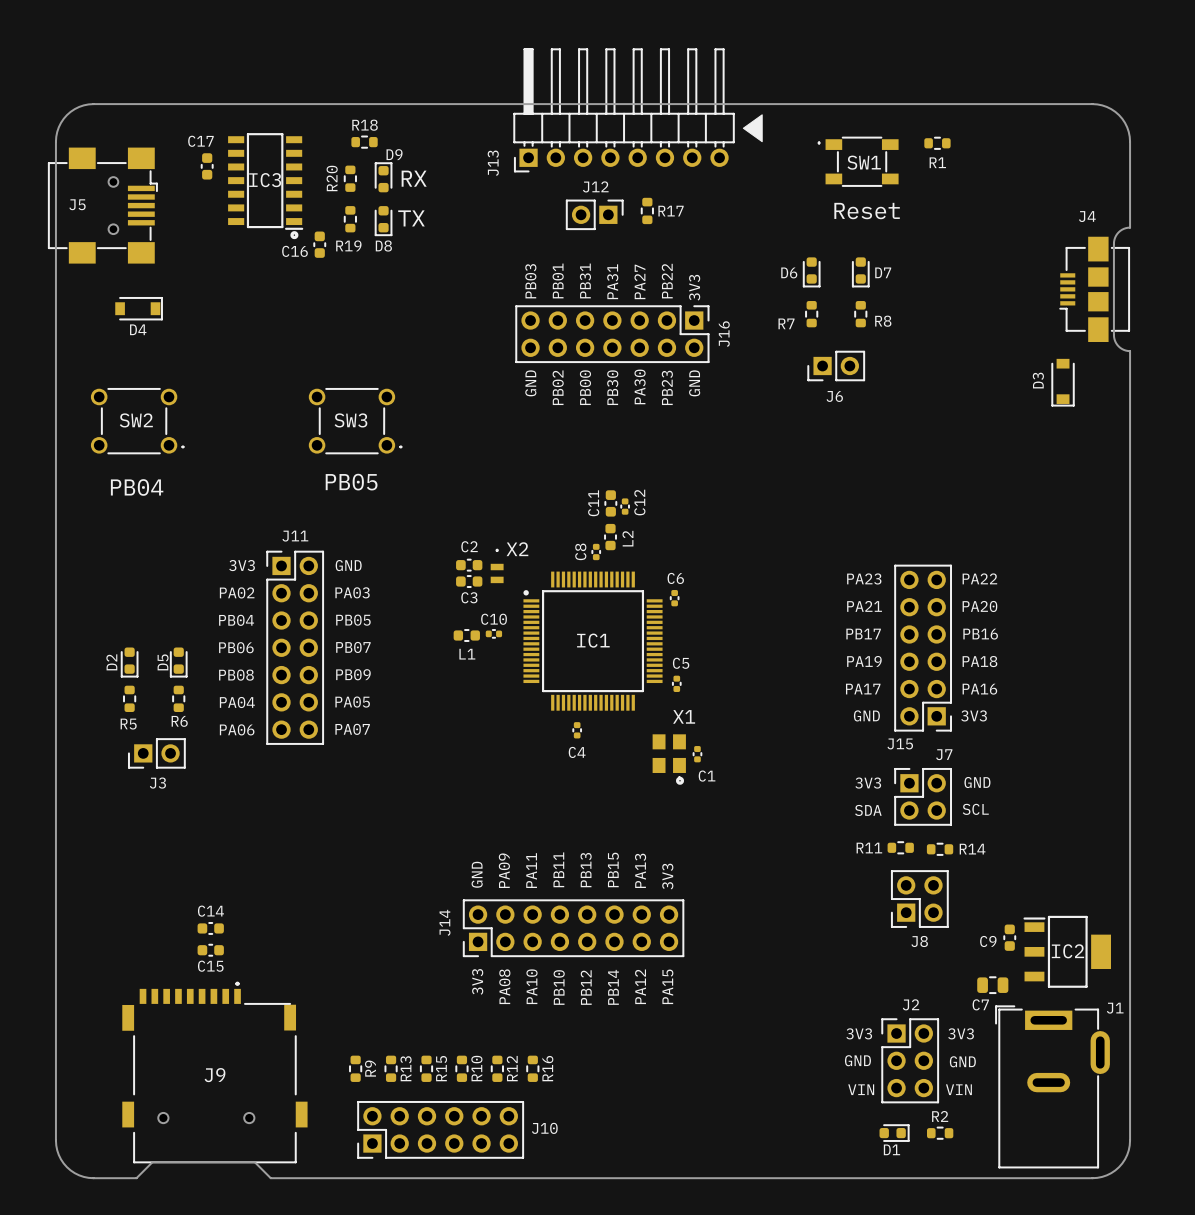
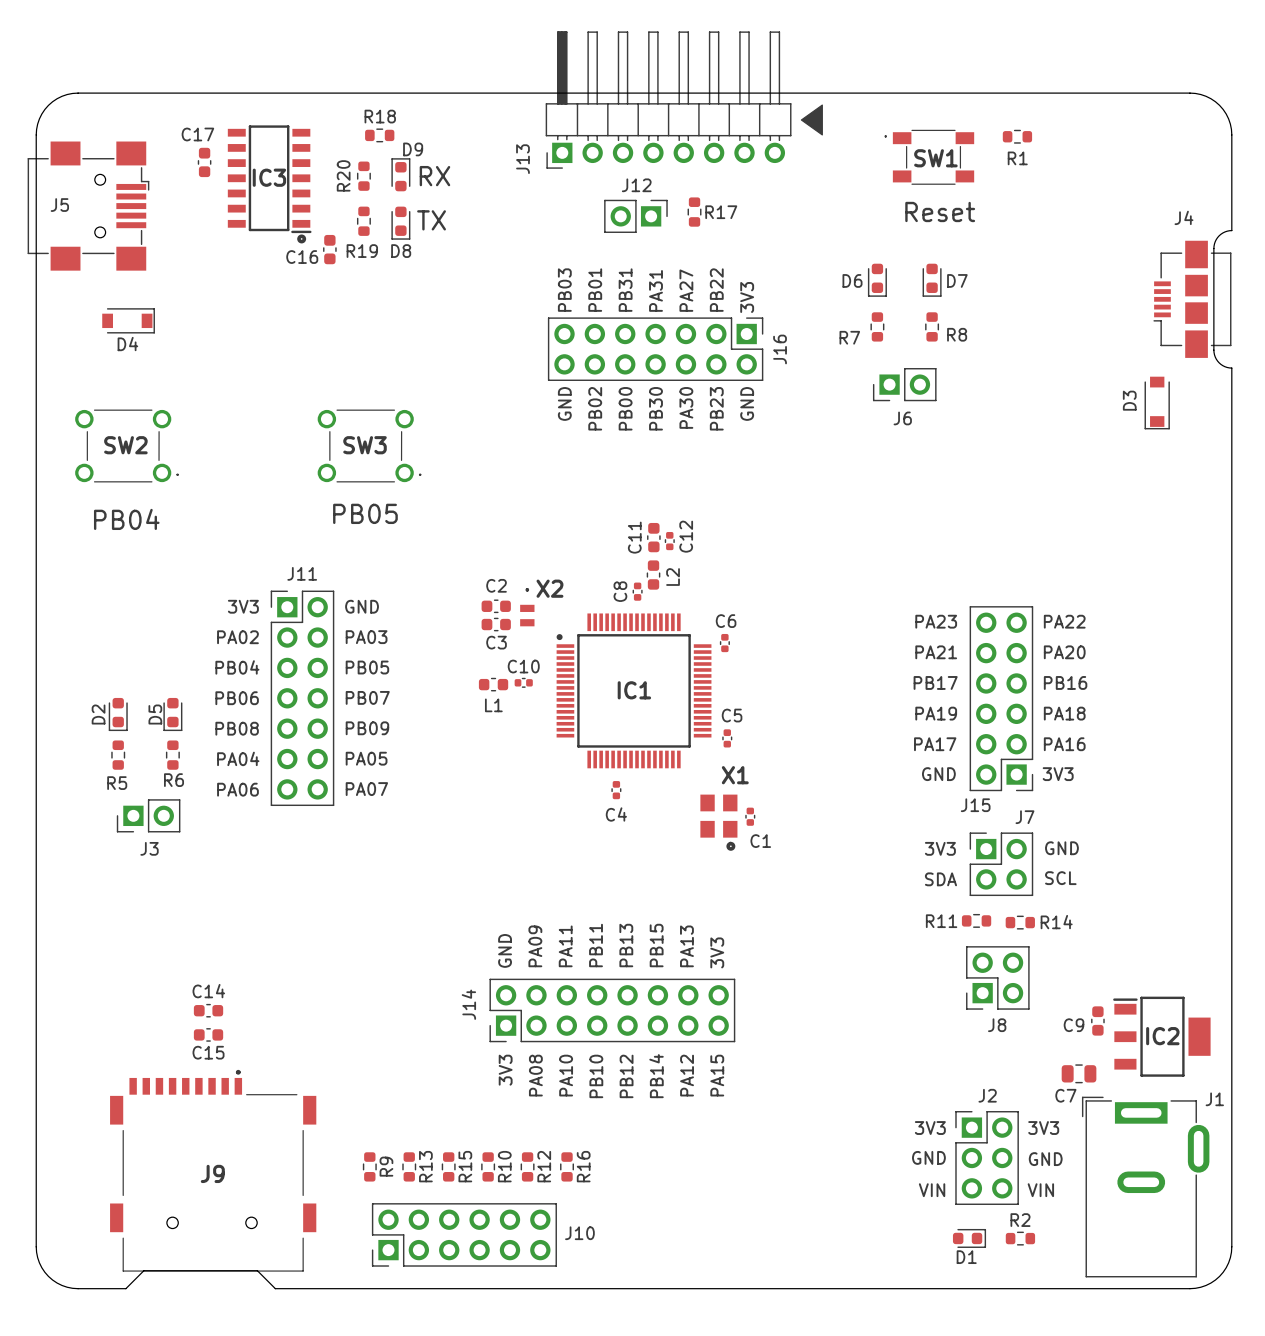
J9 footprint: [122, 981, 308, 1163] -> [110, 1069, 317, 1272]

